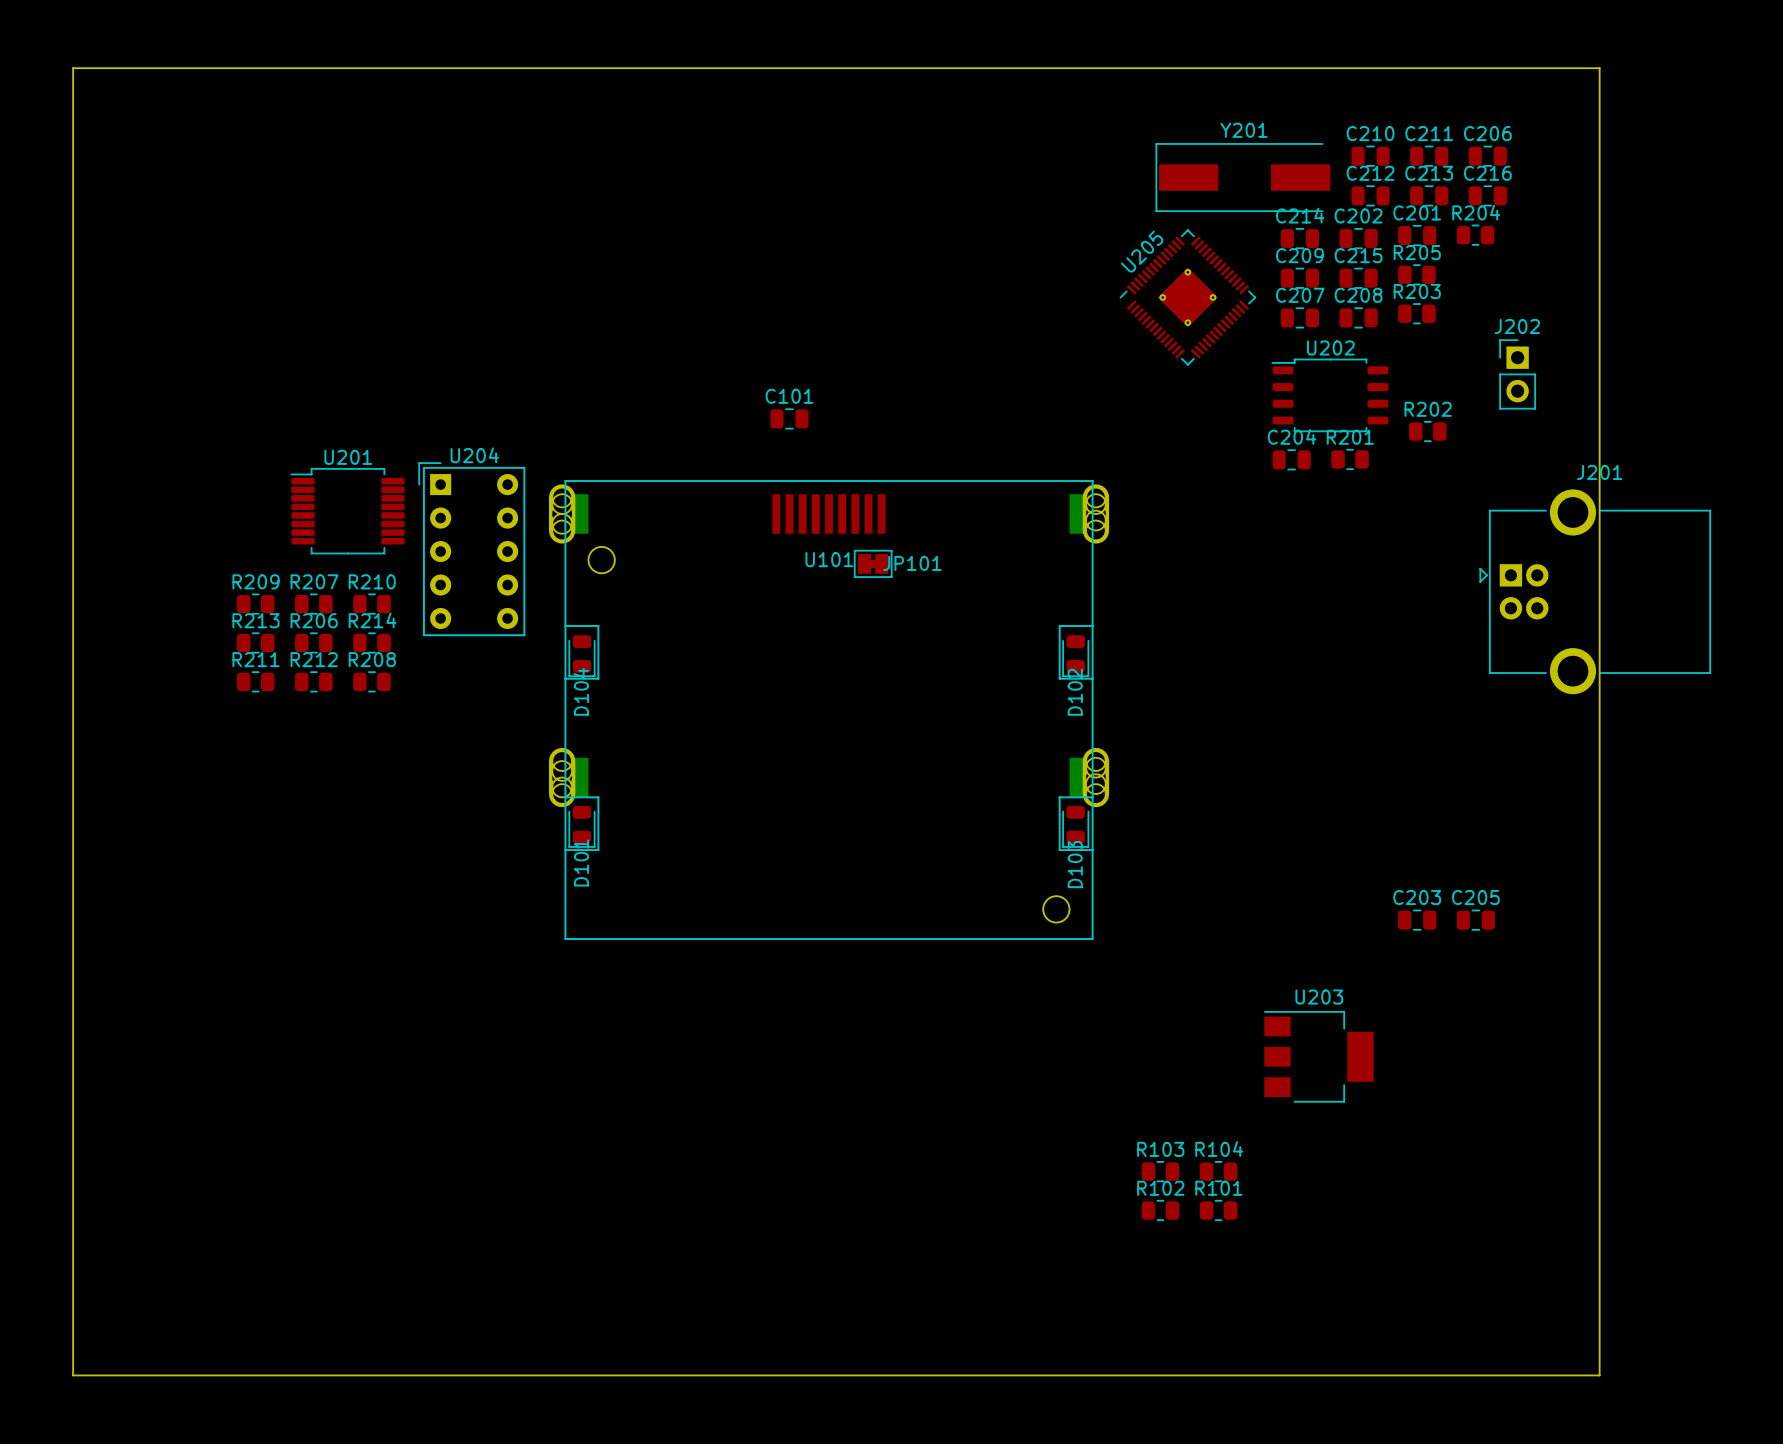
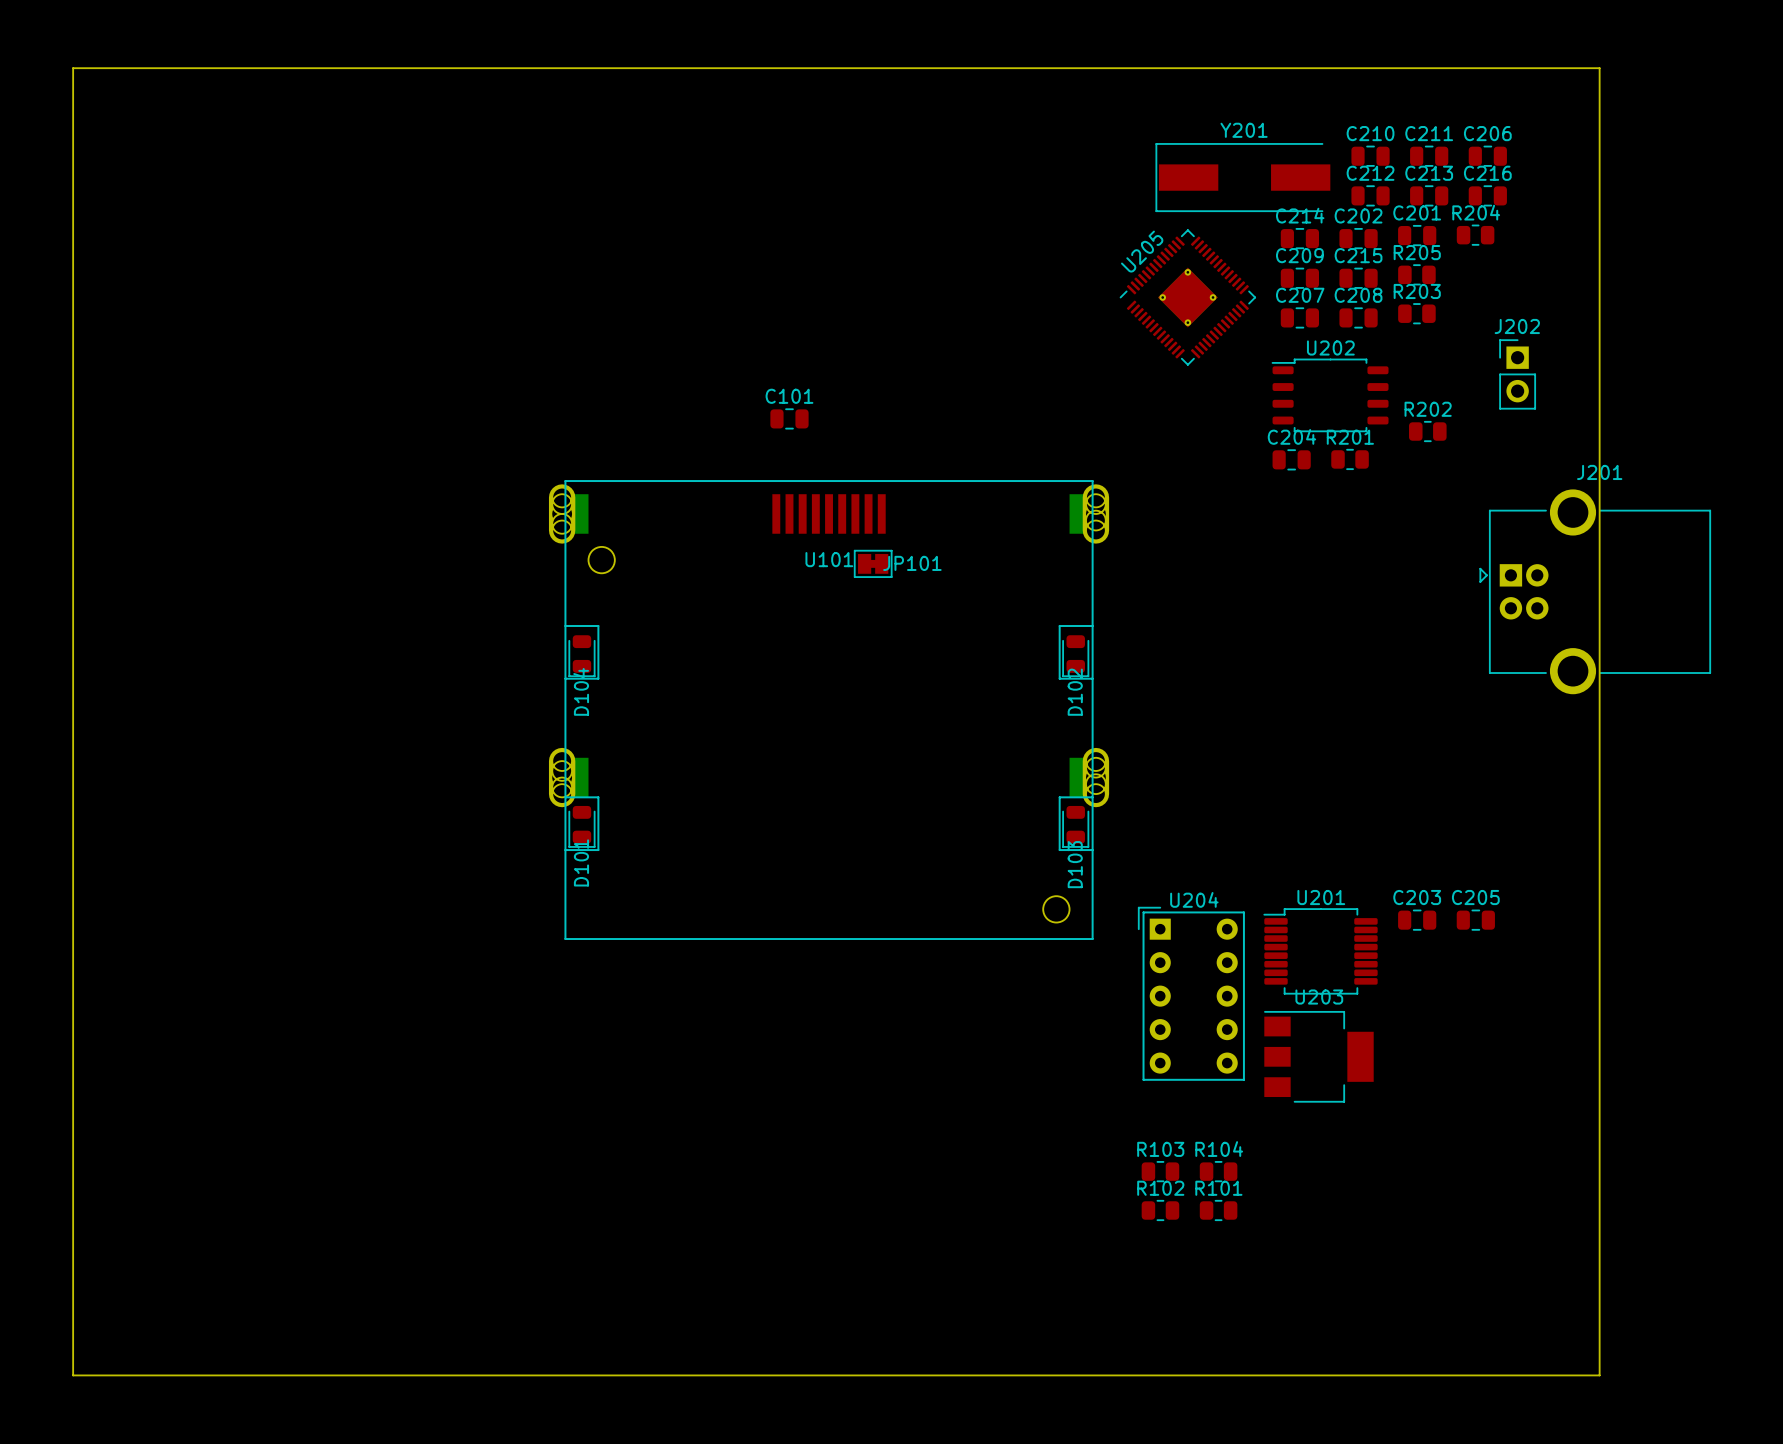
U201 position: (347, 511) -> (1320, 951)
U204 position: (471, 549) -> (1191, 993)
R209: (255, 604) -> none
R207: (313, 604) -> none
R210: (371, 604) -> none
R213: (255, 642) -> none
R206: (313, 642) -> none
R214: (371, 642) -> none
R211: (255, 681) -> none
R212: (313, 681) -> none
R208: (371, 681) -> none

